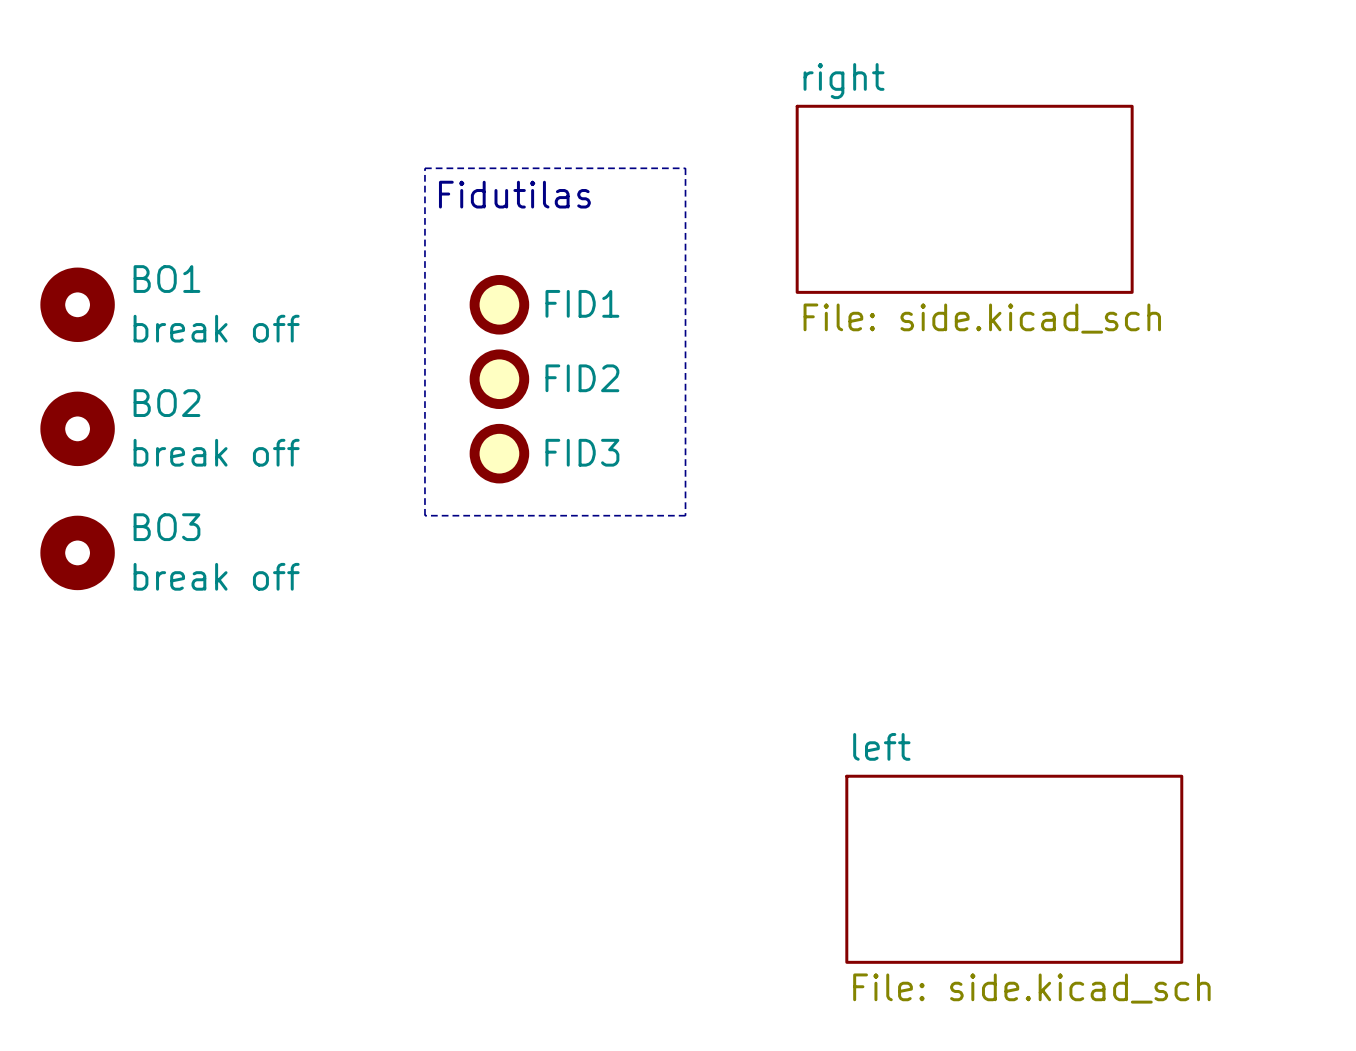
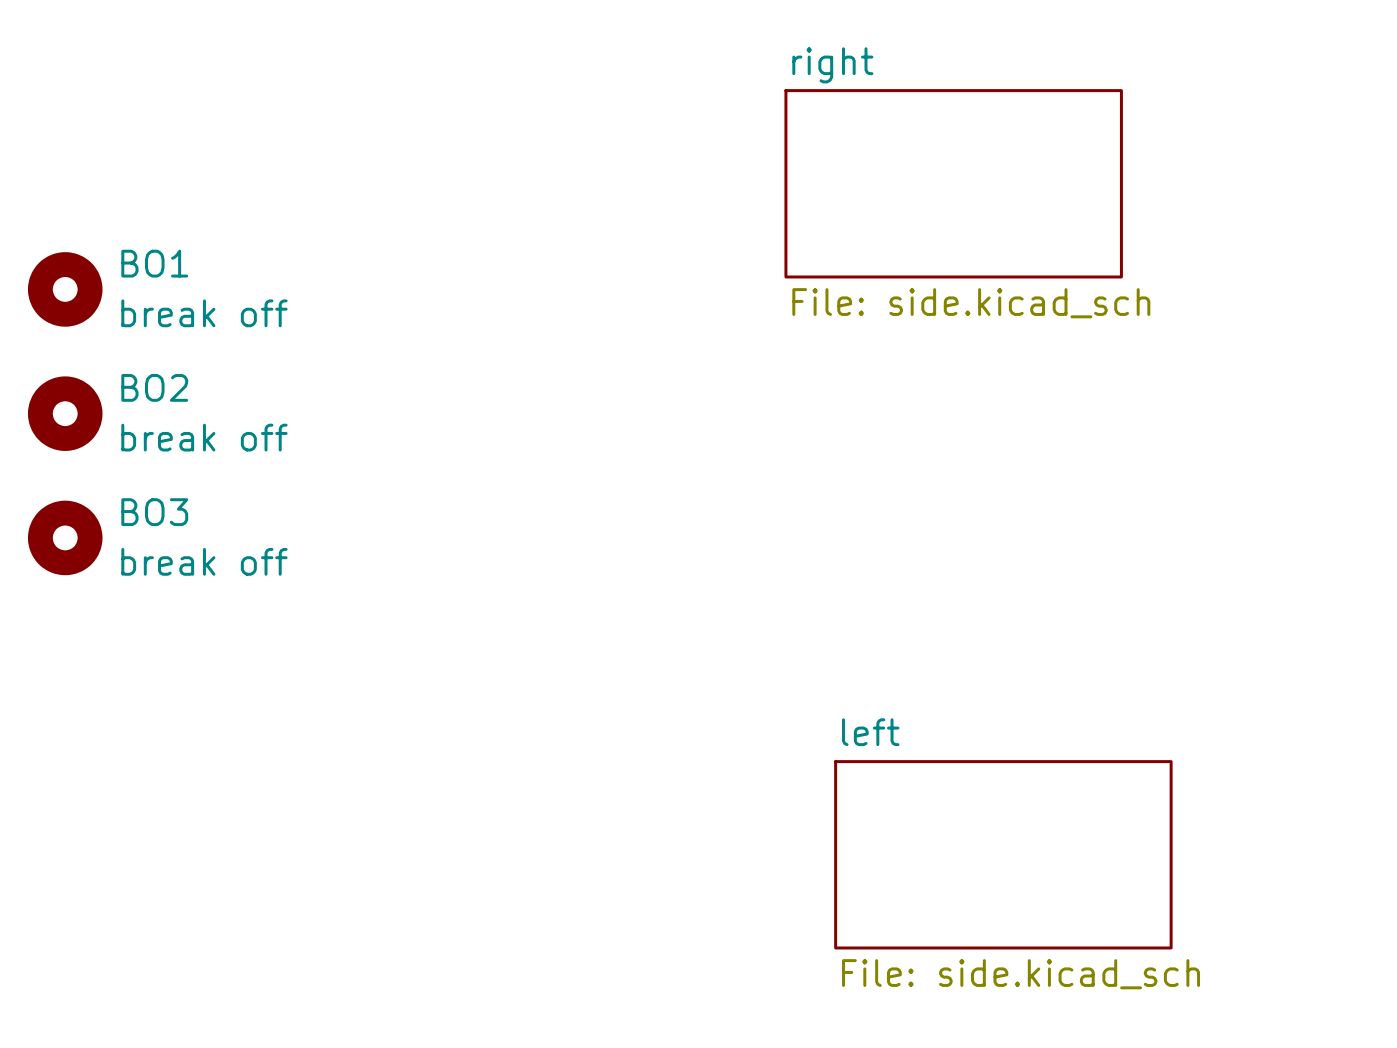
line: (424, 168) (685, 168) (685, 515) (424, 515) (424, 168) -> none
text: Fidutilas (514, 194) -> none
FID1: (499, 304) -> none
FID2: (499, 379) -> none
FID3: (499, 453) -> none

